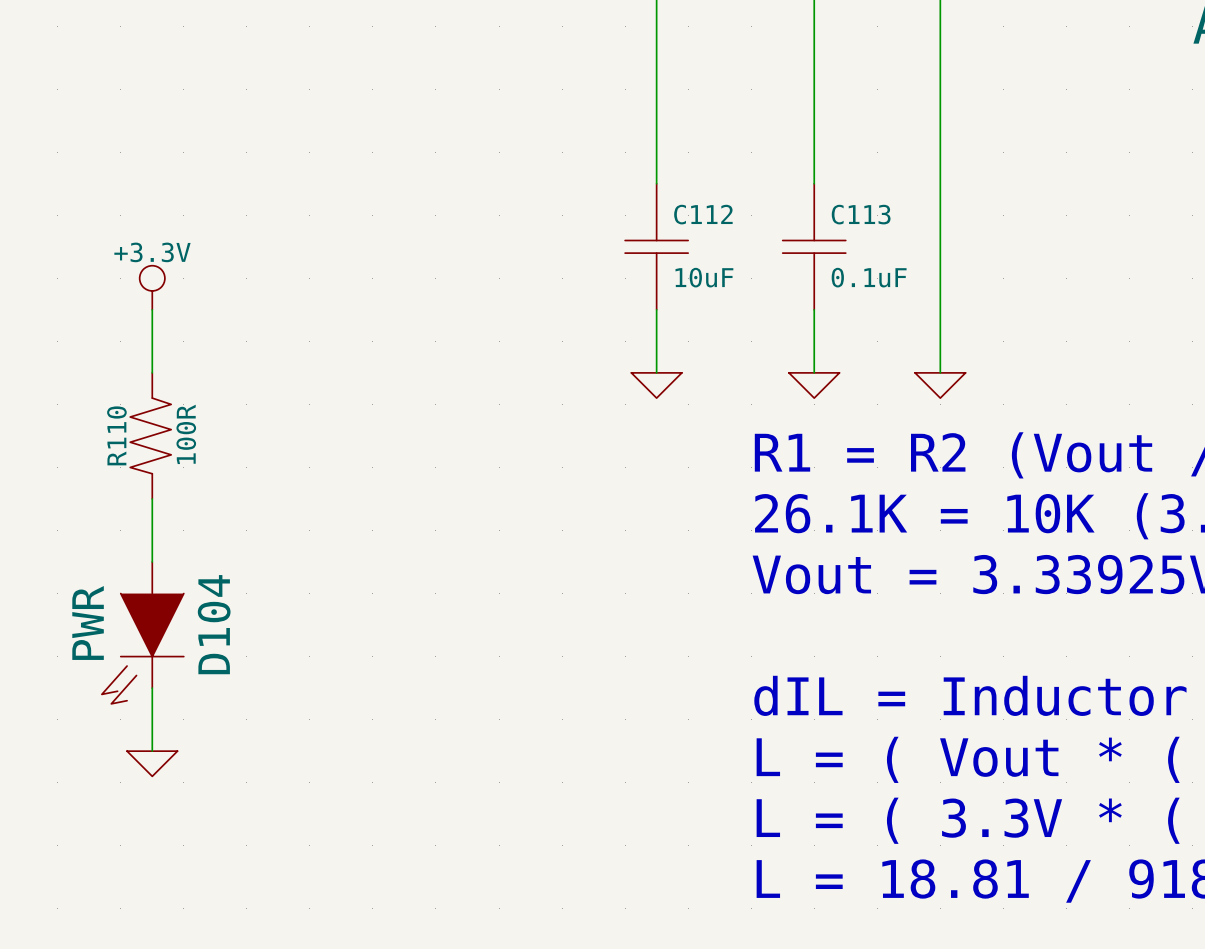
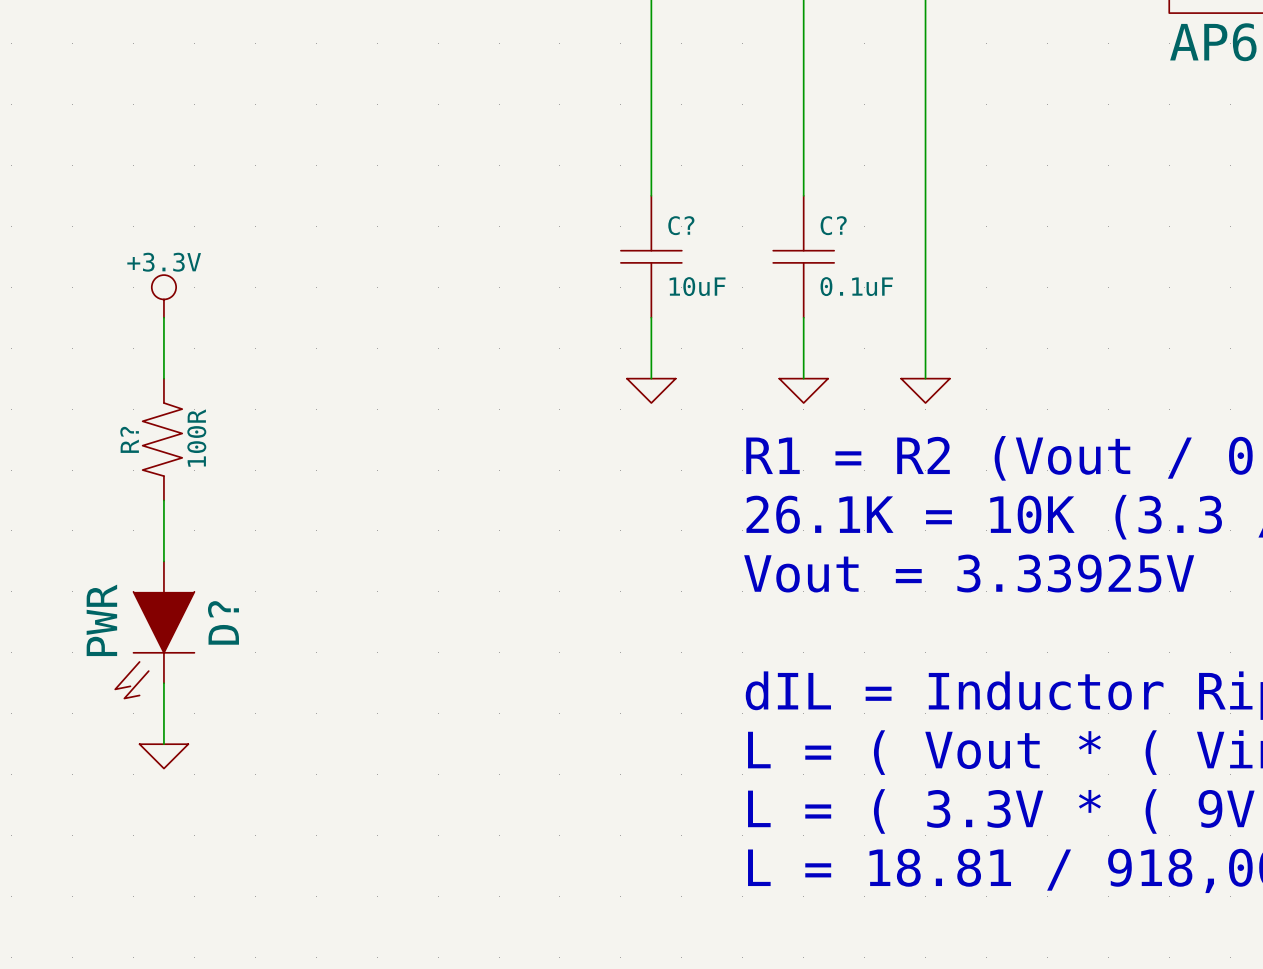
C112 name: C112 (703, 214) -> C? (681, 225)
C113 name: C113 (861, 214) -> C? (833, 225)
R110 name: R110 (116, 435) -> R? (129, 439)
D104 name: D104 (214, 624) -> D? (223, 622)

